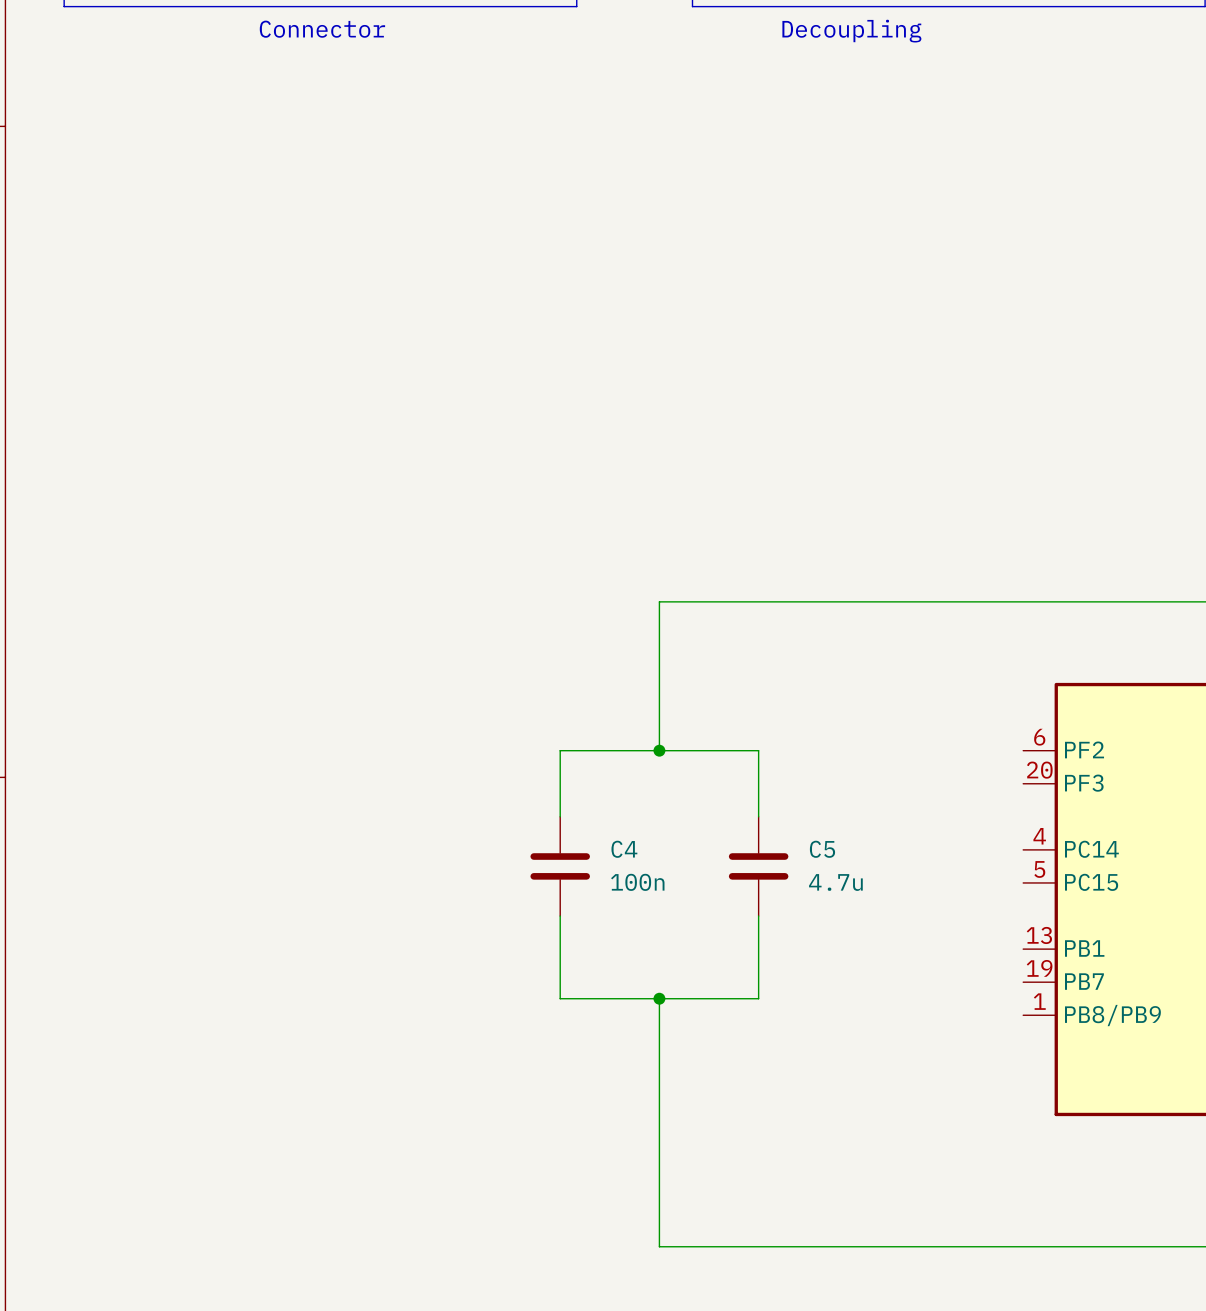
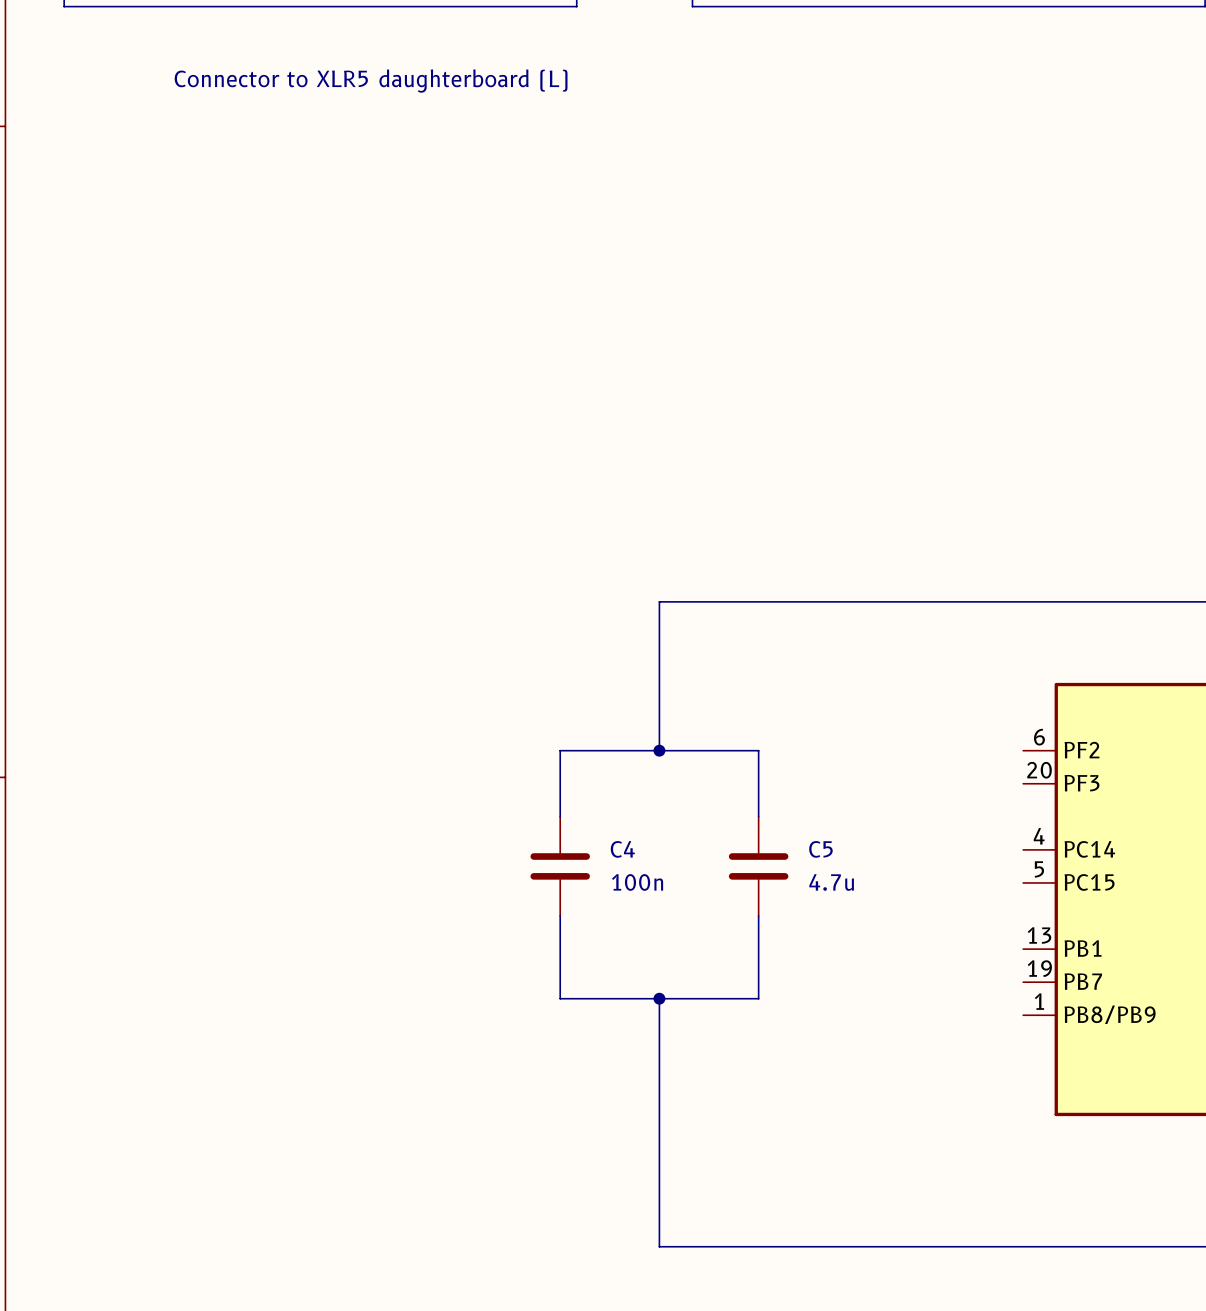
text: Connector (322, 29) -> none
text: Decoupling (851, 31) -> none
text: none -> Connector to XLR5 daughterboard (L) (371, 81)

